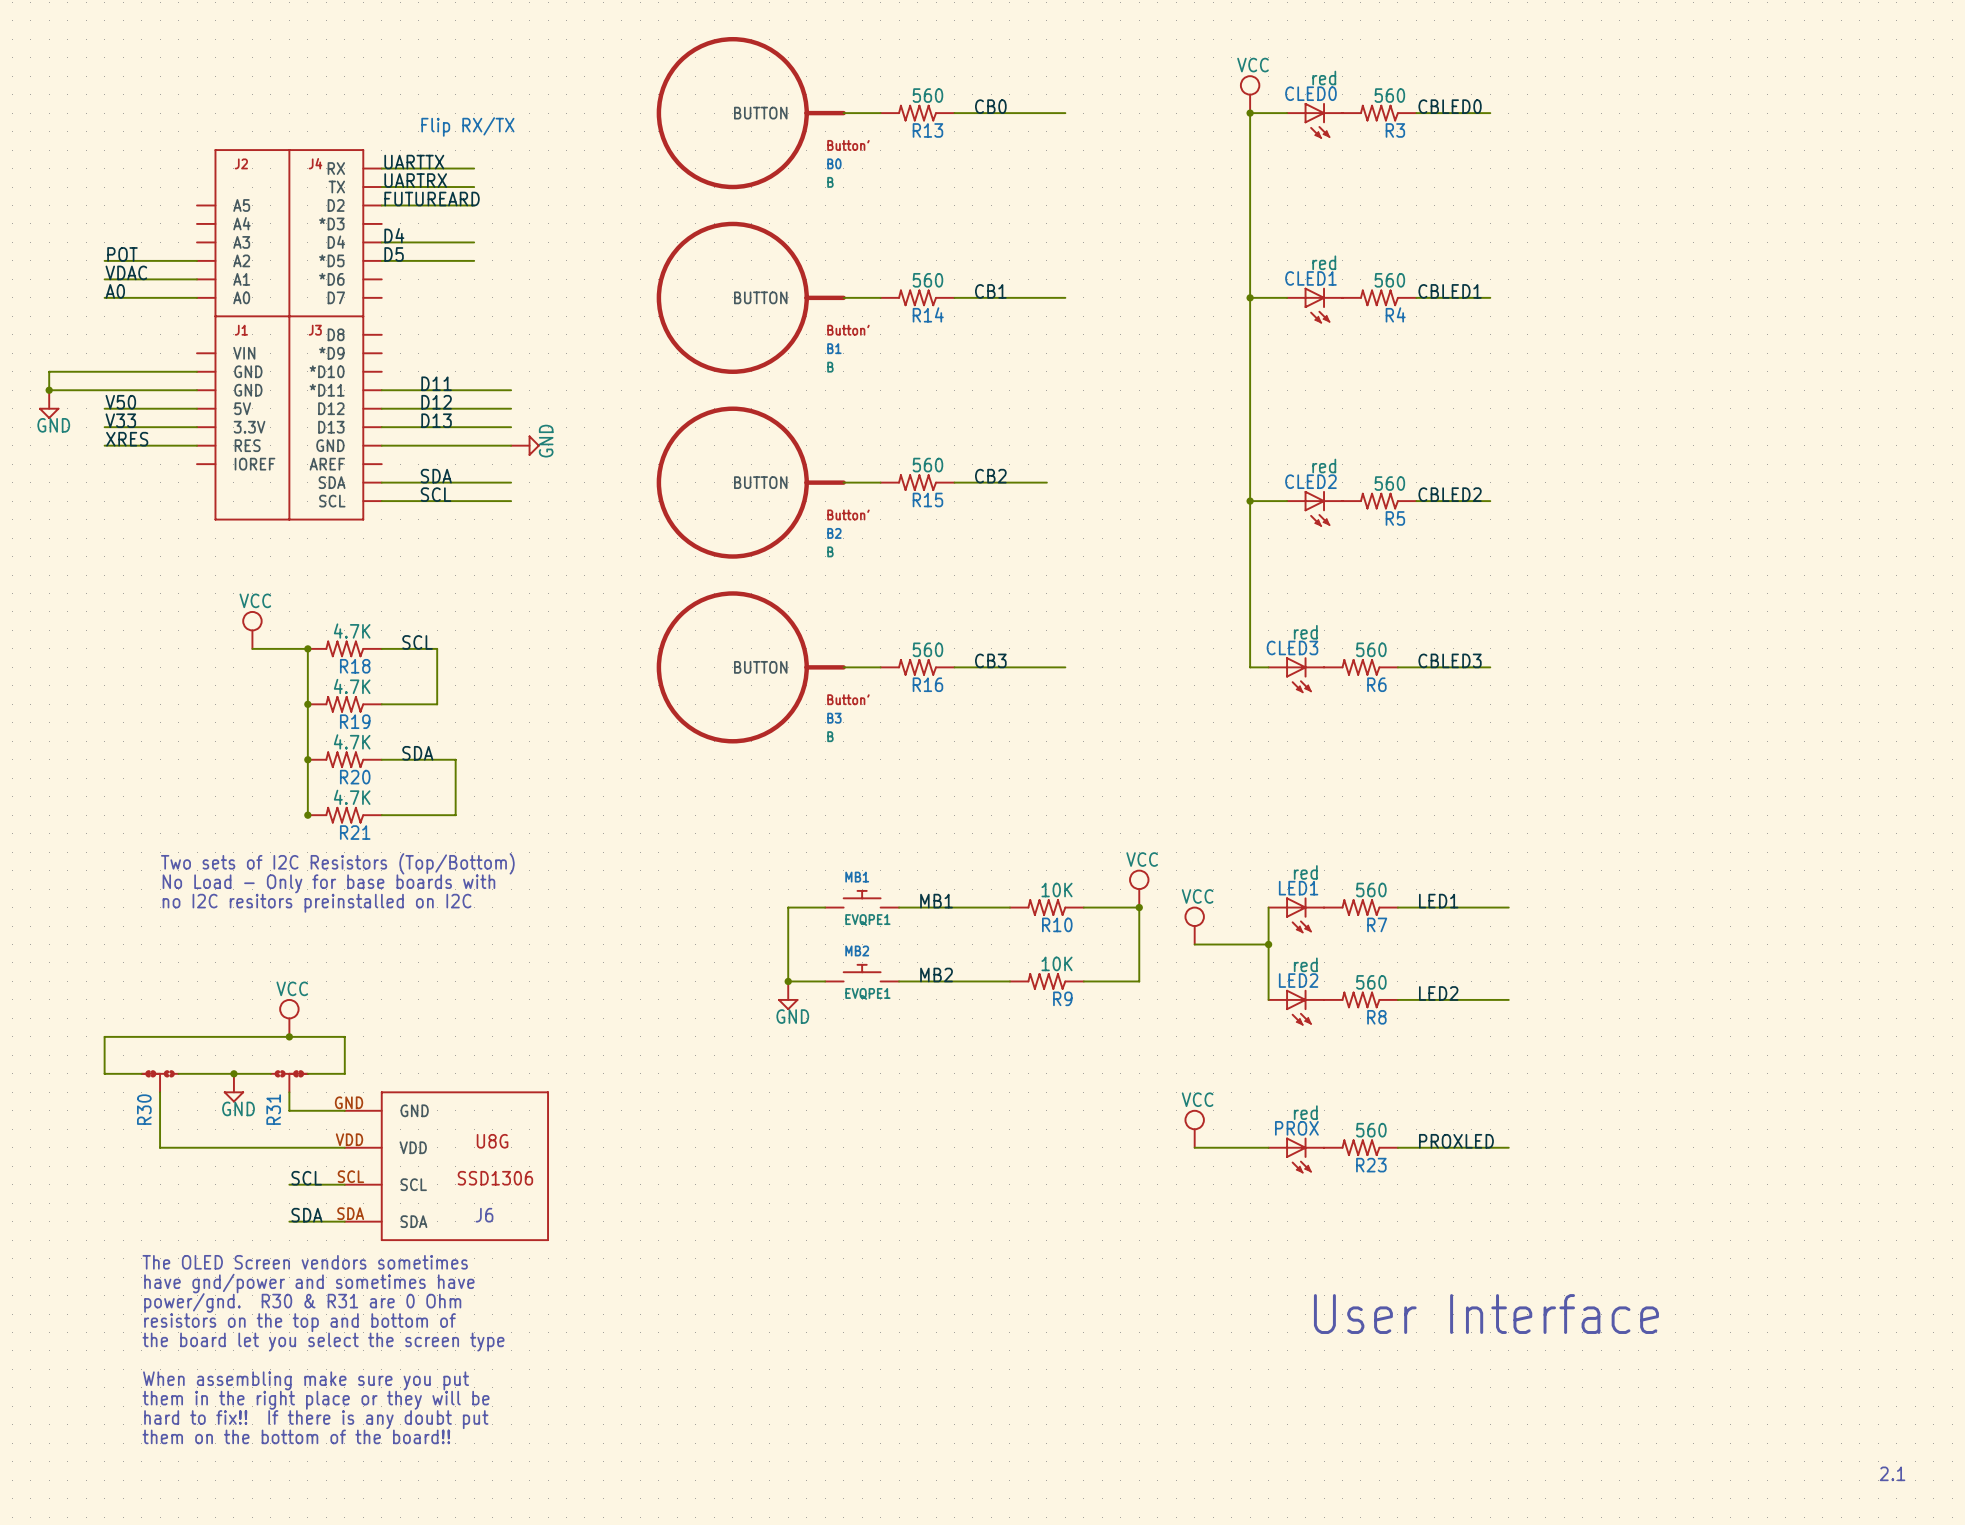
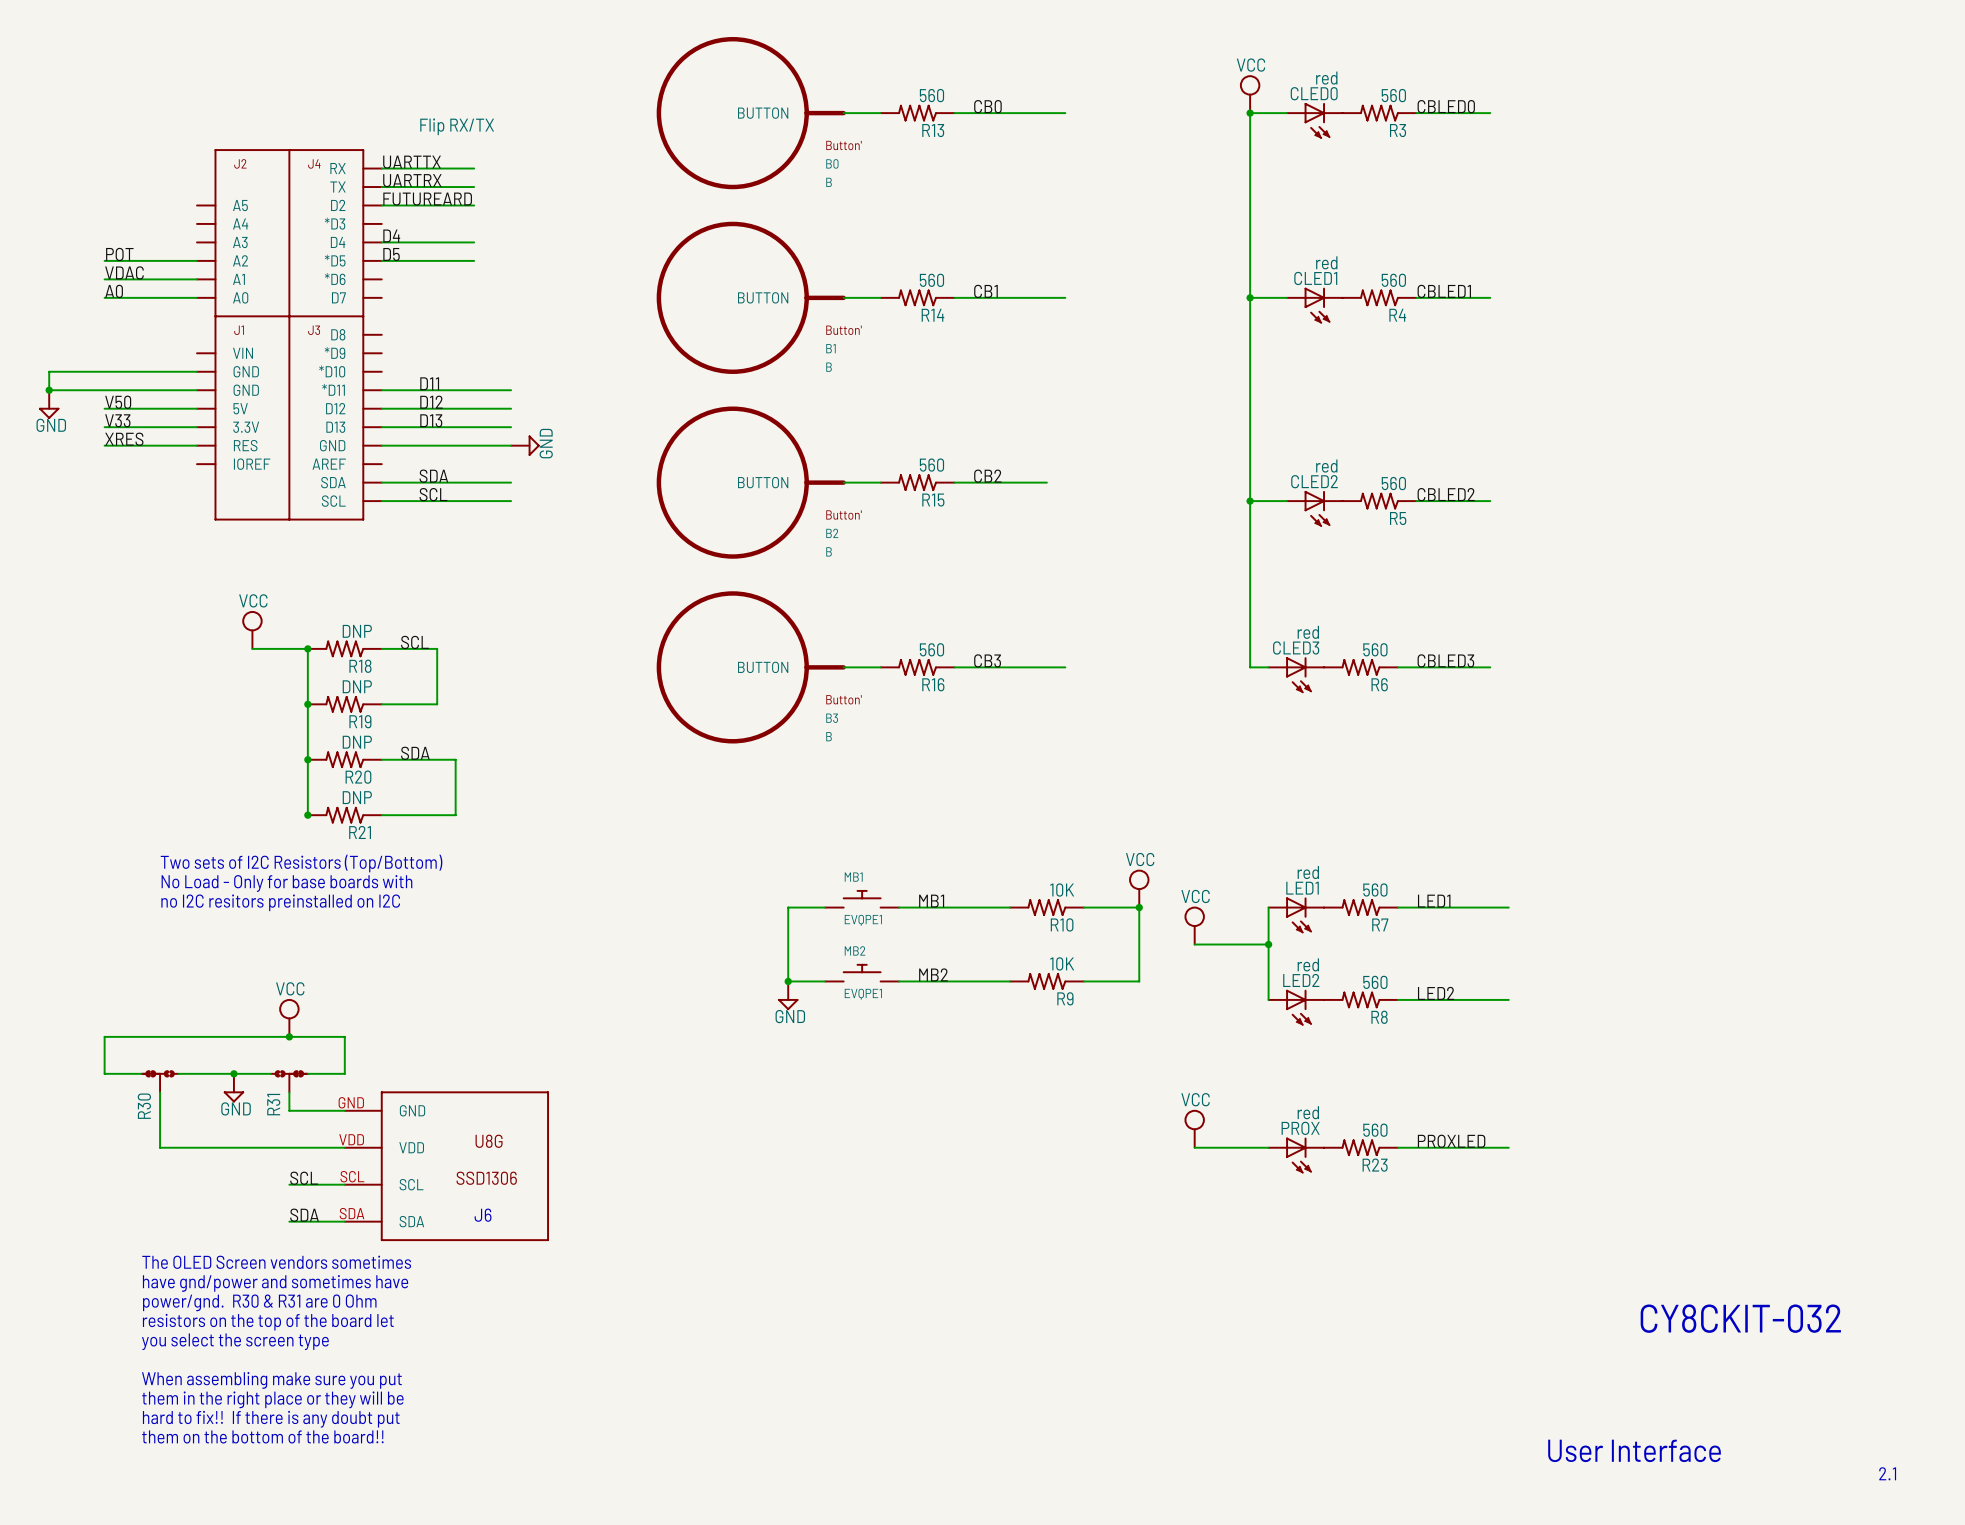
R18 value: 4.7K (352, 631) -> DNP (357, 631)
R19 value: 4.7K (352, 686) -> DNP (357, 686)
R20 value: 4.7K (352, 741) -> DNP (357, 742)
R21 value: 4.7K (352, 797) -> DNP (357, 797)
text: User Interface (1486, 1314) -> none
text: none -> CY8CKIT-032 (1740, 1318)
text: resistors on the top and bottom of (299, 1322) -> resistors on the top of the board let (268, 1322)
text: the board let you select the screen type (323, 1342) -> you select the screen type (235, 1341)
text: none -> User Interface (1634, 1450)

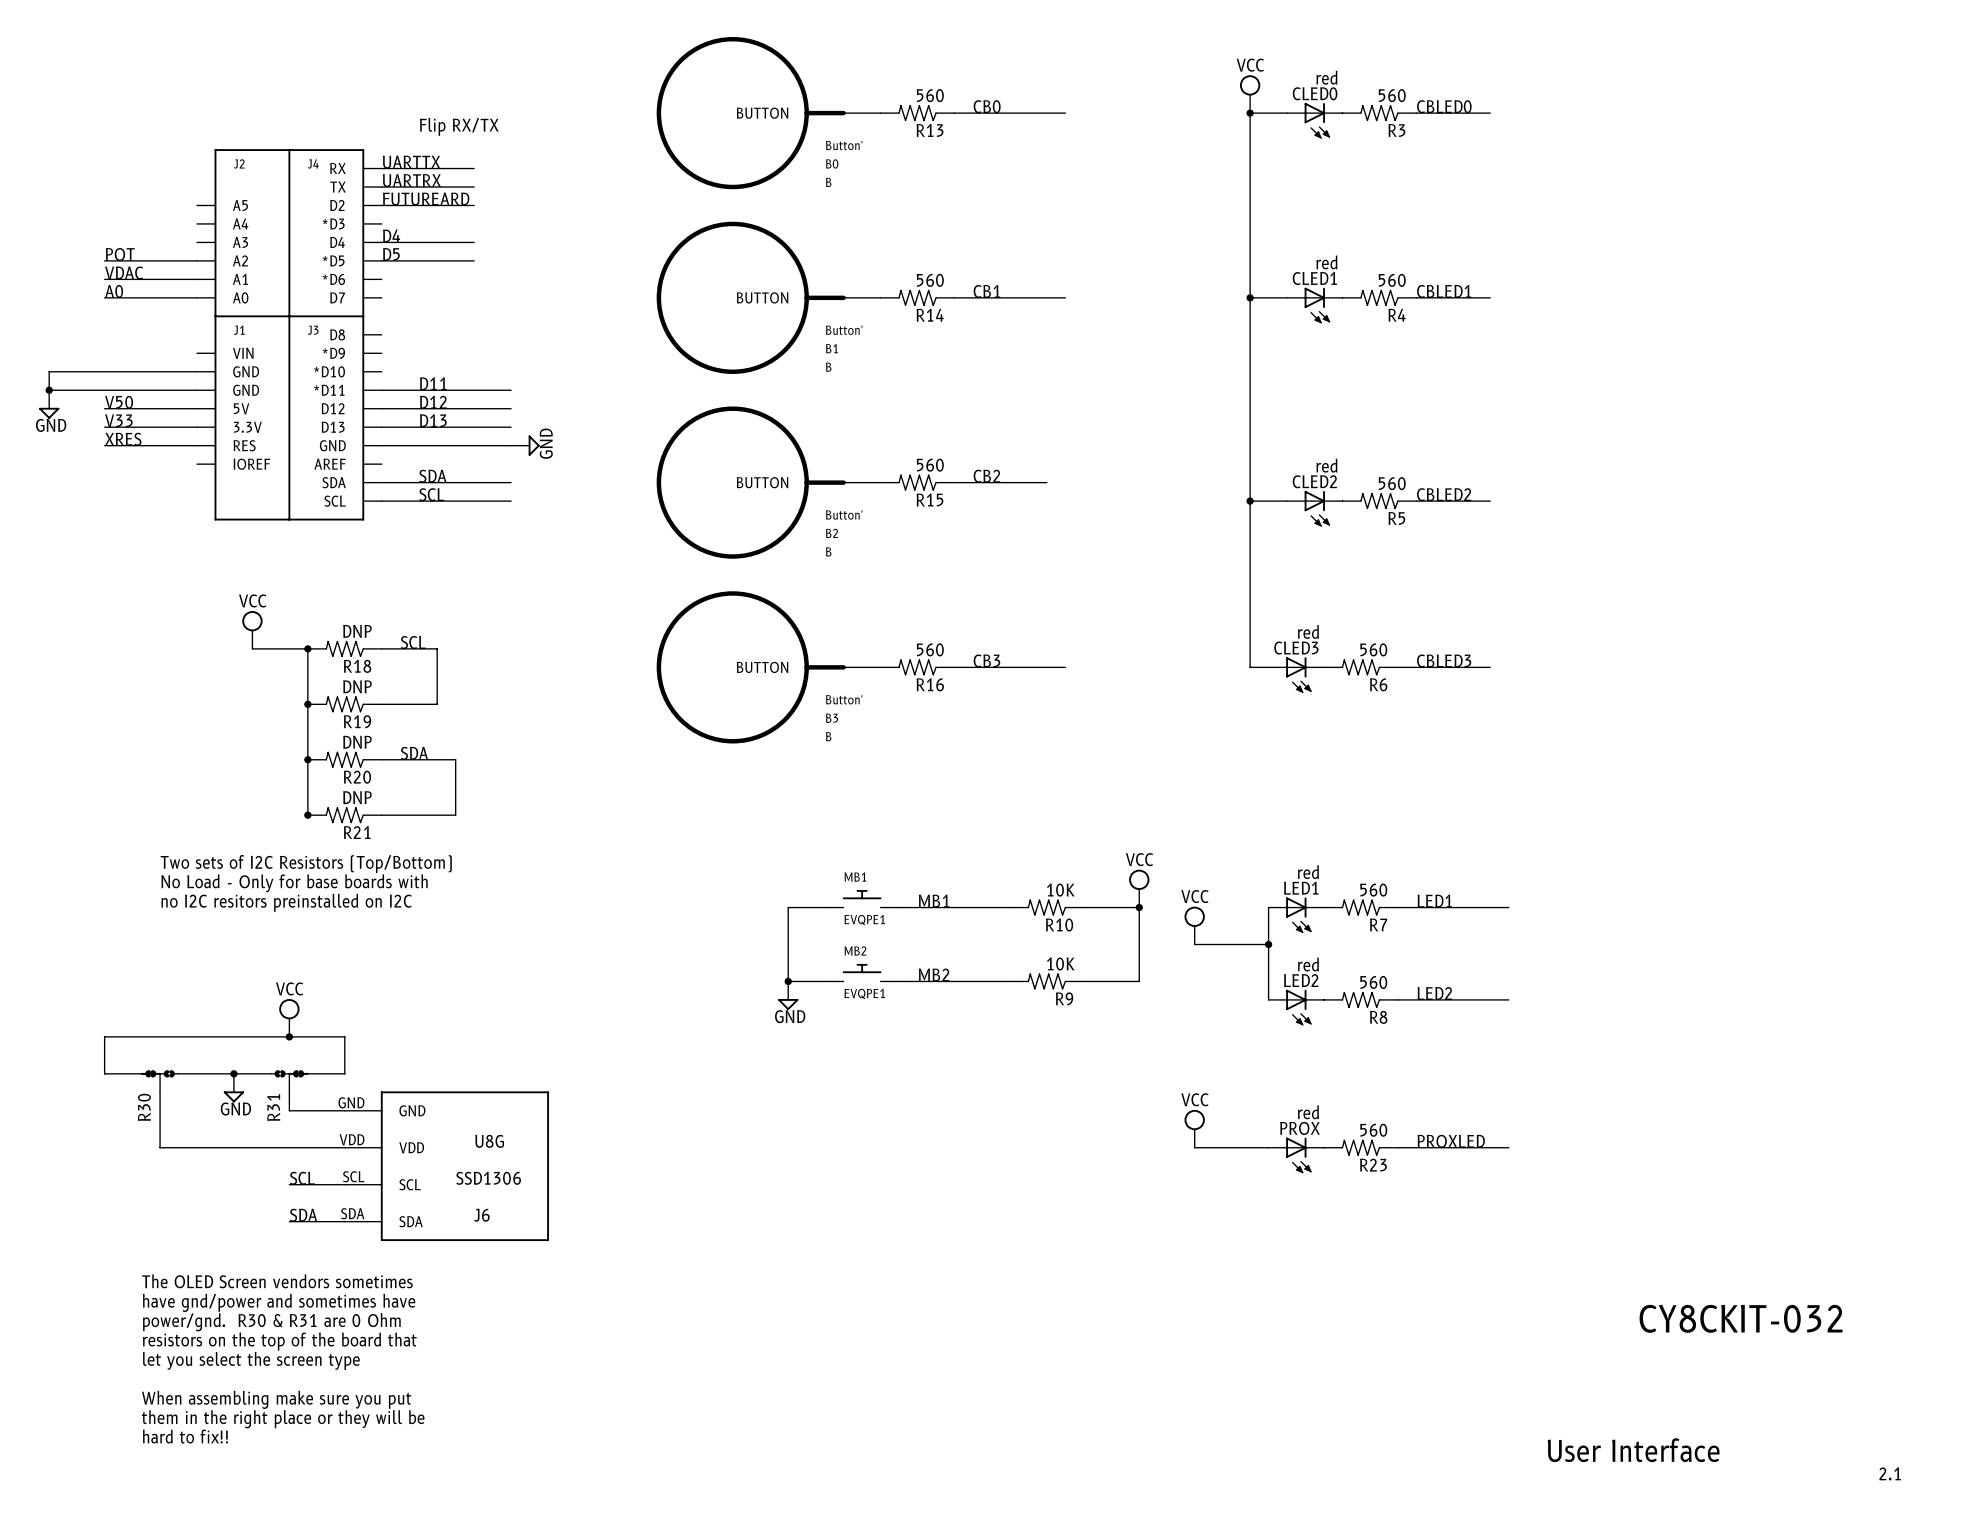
text: The OLED Screen vendors sometimes (276, 1262) -> none
text: have gnd/power and sometimes have (275, 1283) -> The OLED Screen vendors sometimes (277, 1281)
text: power/gnd. R30 & R31 are 0 Ohm (259, 1302) -> have gnd/power and sometimes have (279, 1302)
text: resistors on the top of the board let (268, 1322) -> power/gnd. R30 & R31 are 0 Ohm (271, 1322)
text: you select the screen type (235, 1341) -> resistors on the top of the board that (279, 1341)
text: none -> let you select the screen type (251, 1360)
text: When assembling make sure you put (271, 1380) -> none
text: them in the right place or they will be (272, 1399) -> When assembling make sure you put (276, 1399)
text: hard to fix!! If there is any doubt put (271, 1419) -> them in the right place or they will be (283, 1419)
text: them on the bottom of the board!! (262, 1436) -> hard to fix!! (185, 1436)

